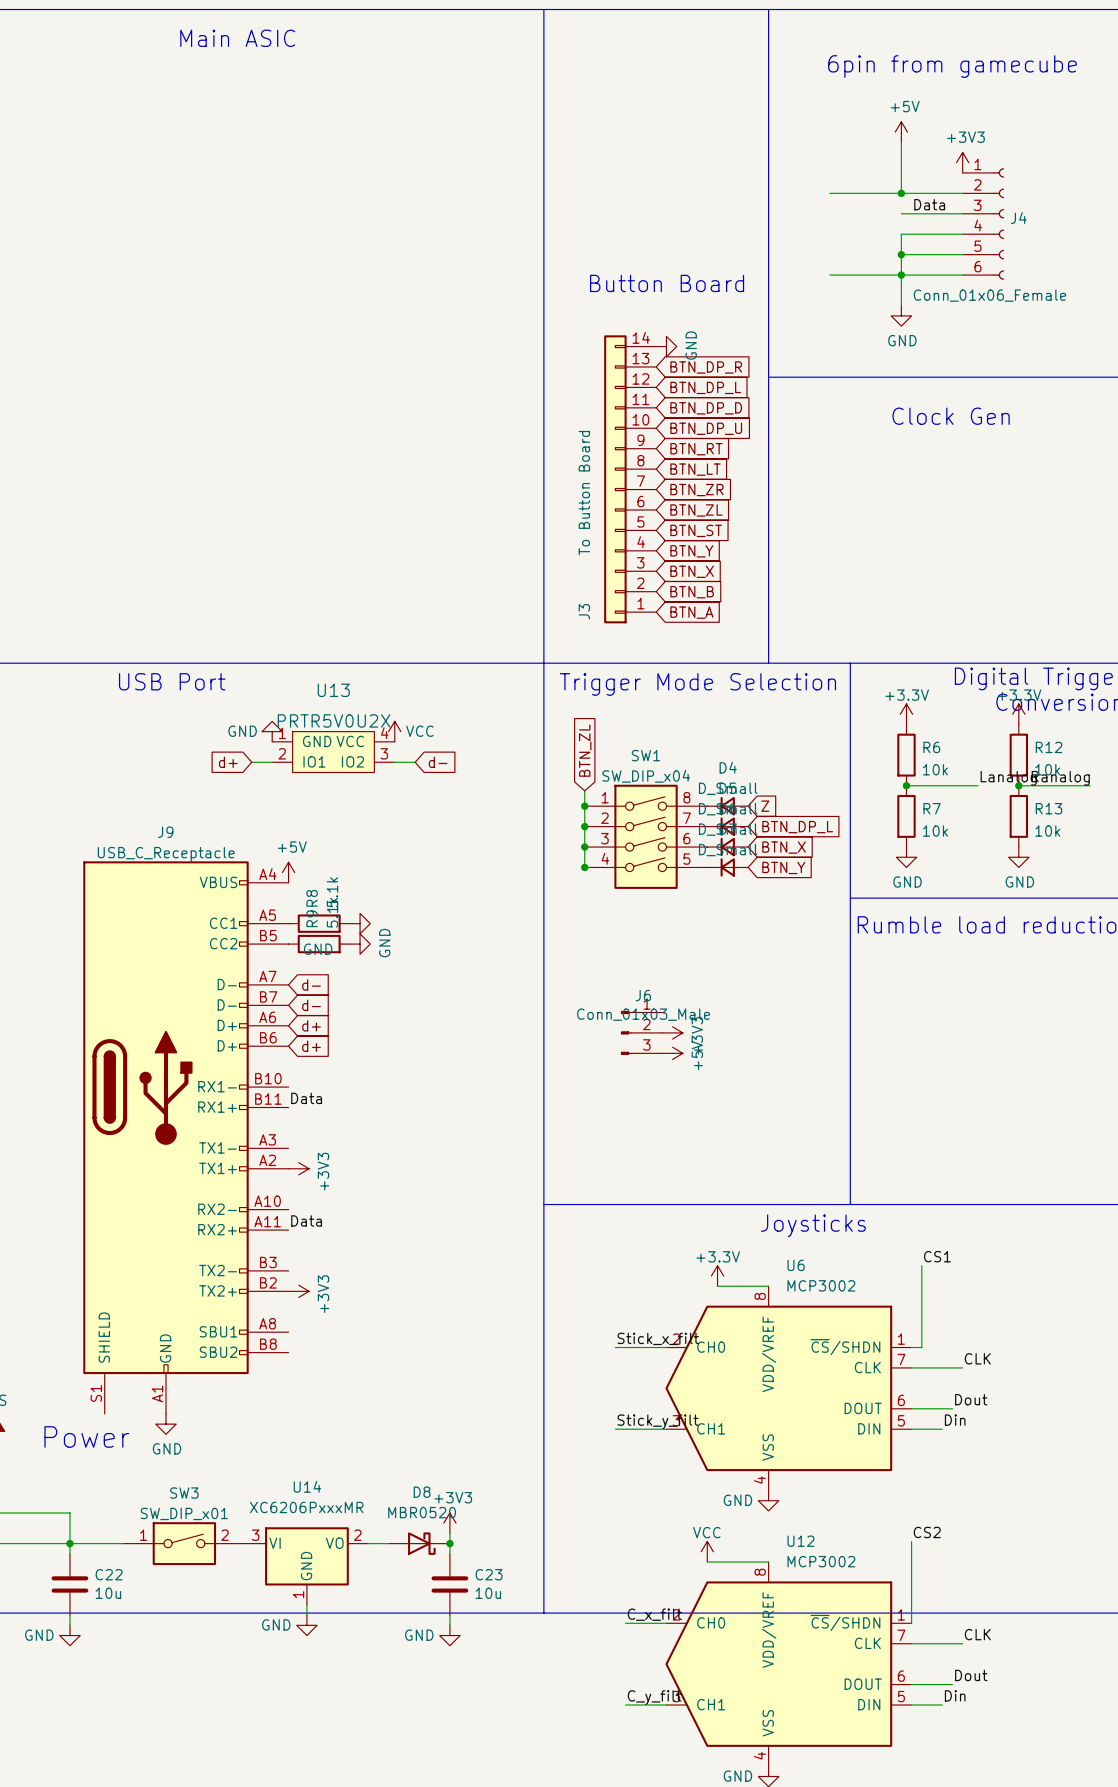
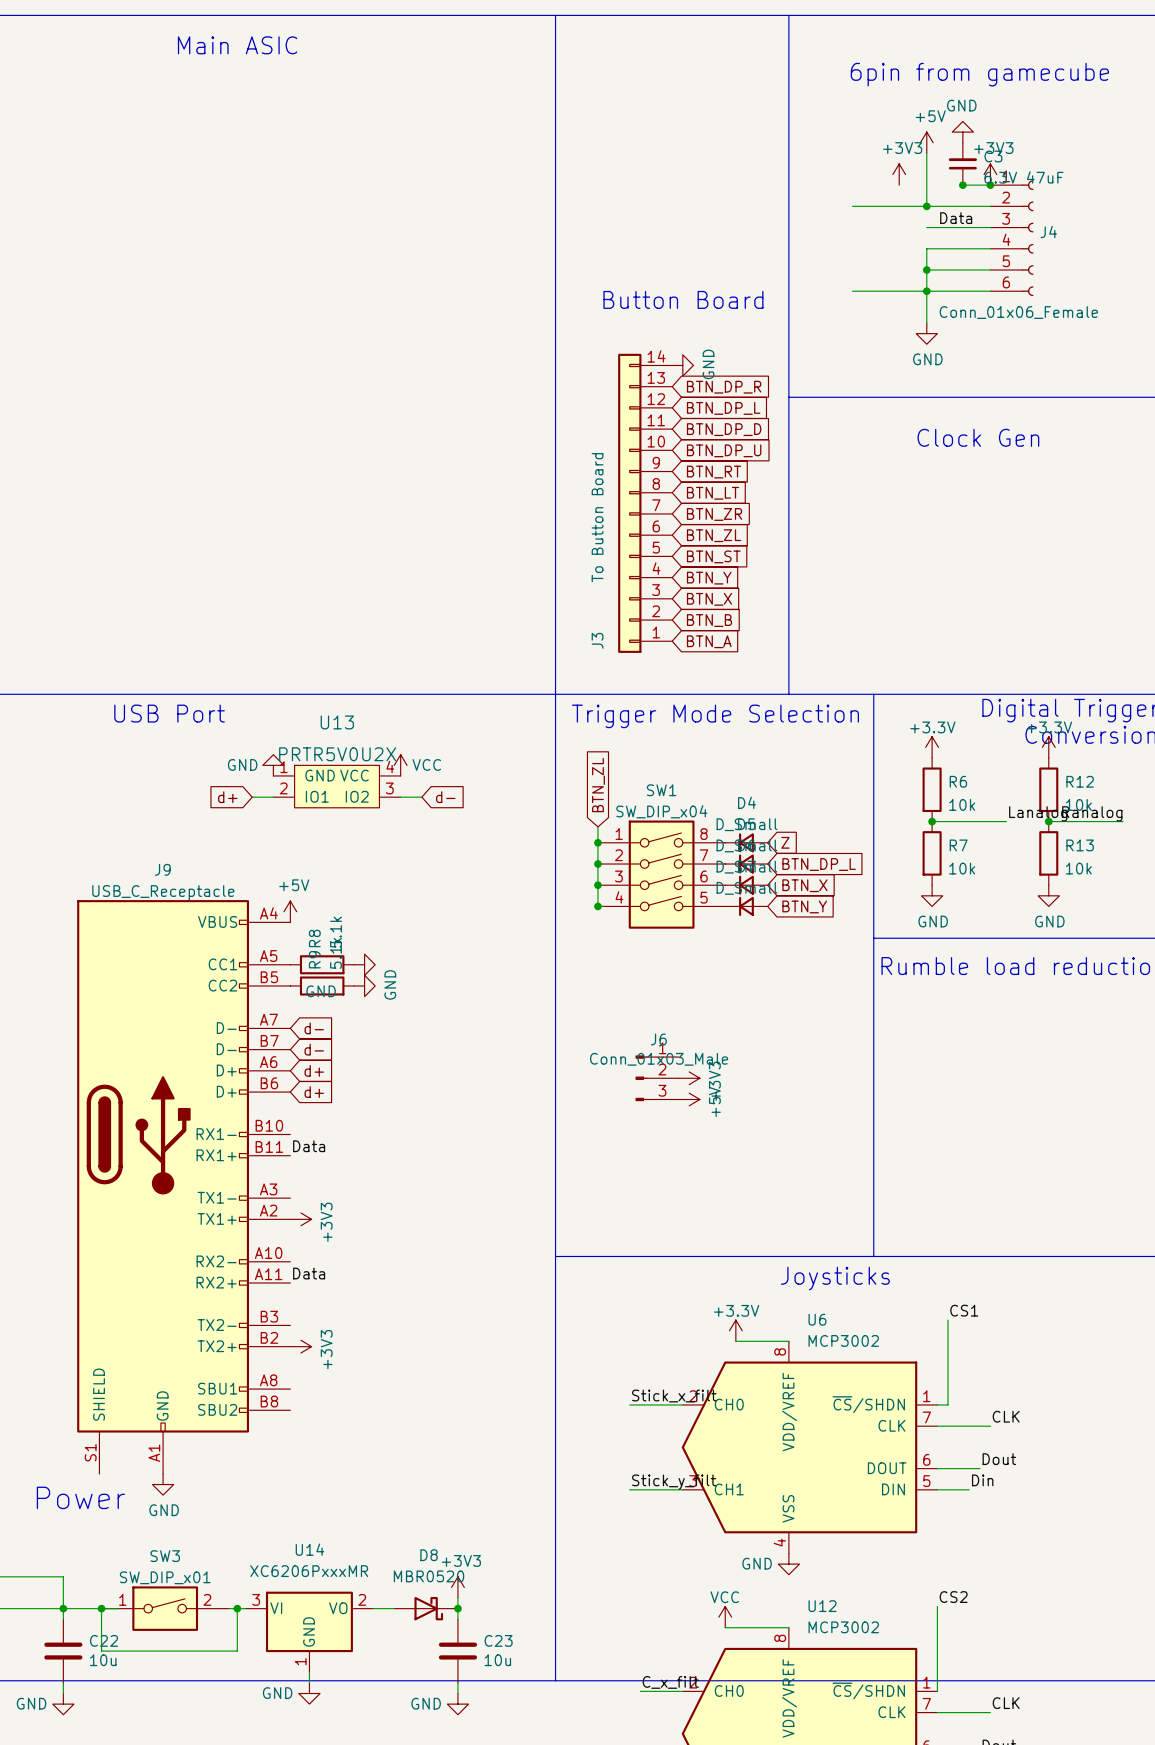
power symbol: none -> GND (962, 132)
C3: none -> 6.3V 47uF (962, 163)
power symbol: none -> +3V3 (899, 174)
wire: none -> (962, 185) (990, 185)
junction: none -> (962, 185)
junction: none -> (990, 185)
wire: none -> (101, 1608) (101, 1651) (237, 1651) (237, 1608)
junction: none -> (101, 1608)
SW3 position: (184, 1543) -> (165, 1608)
junction: none -> (237, 1608)

